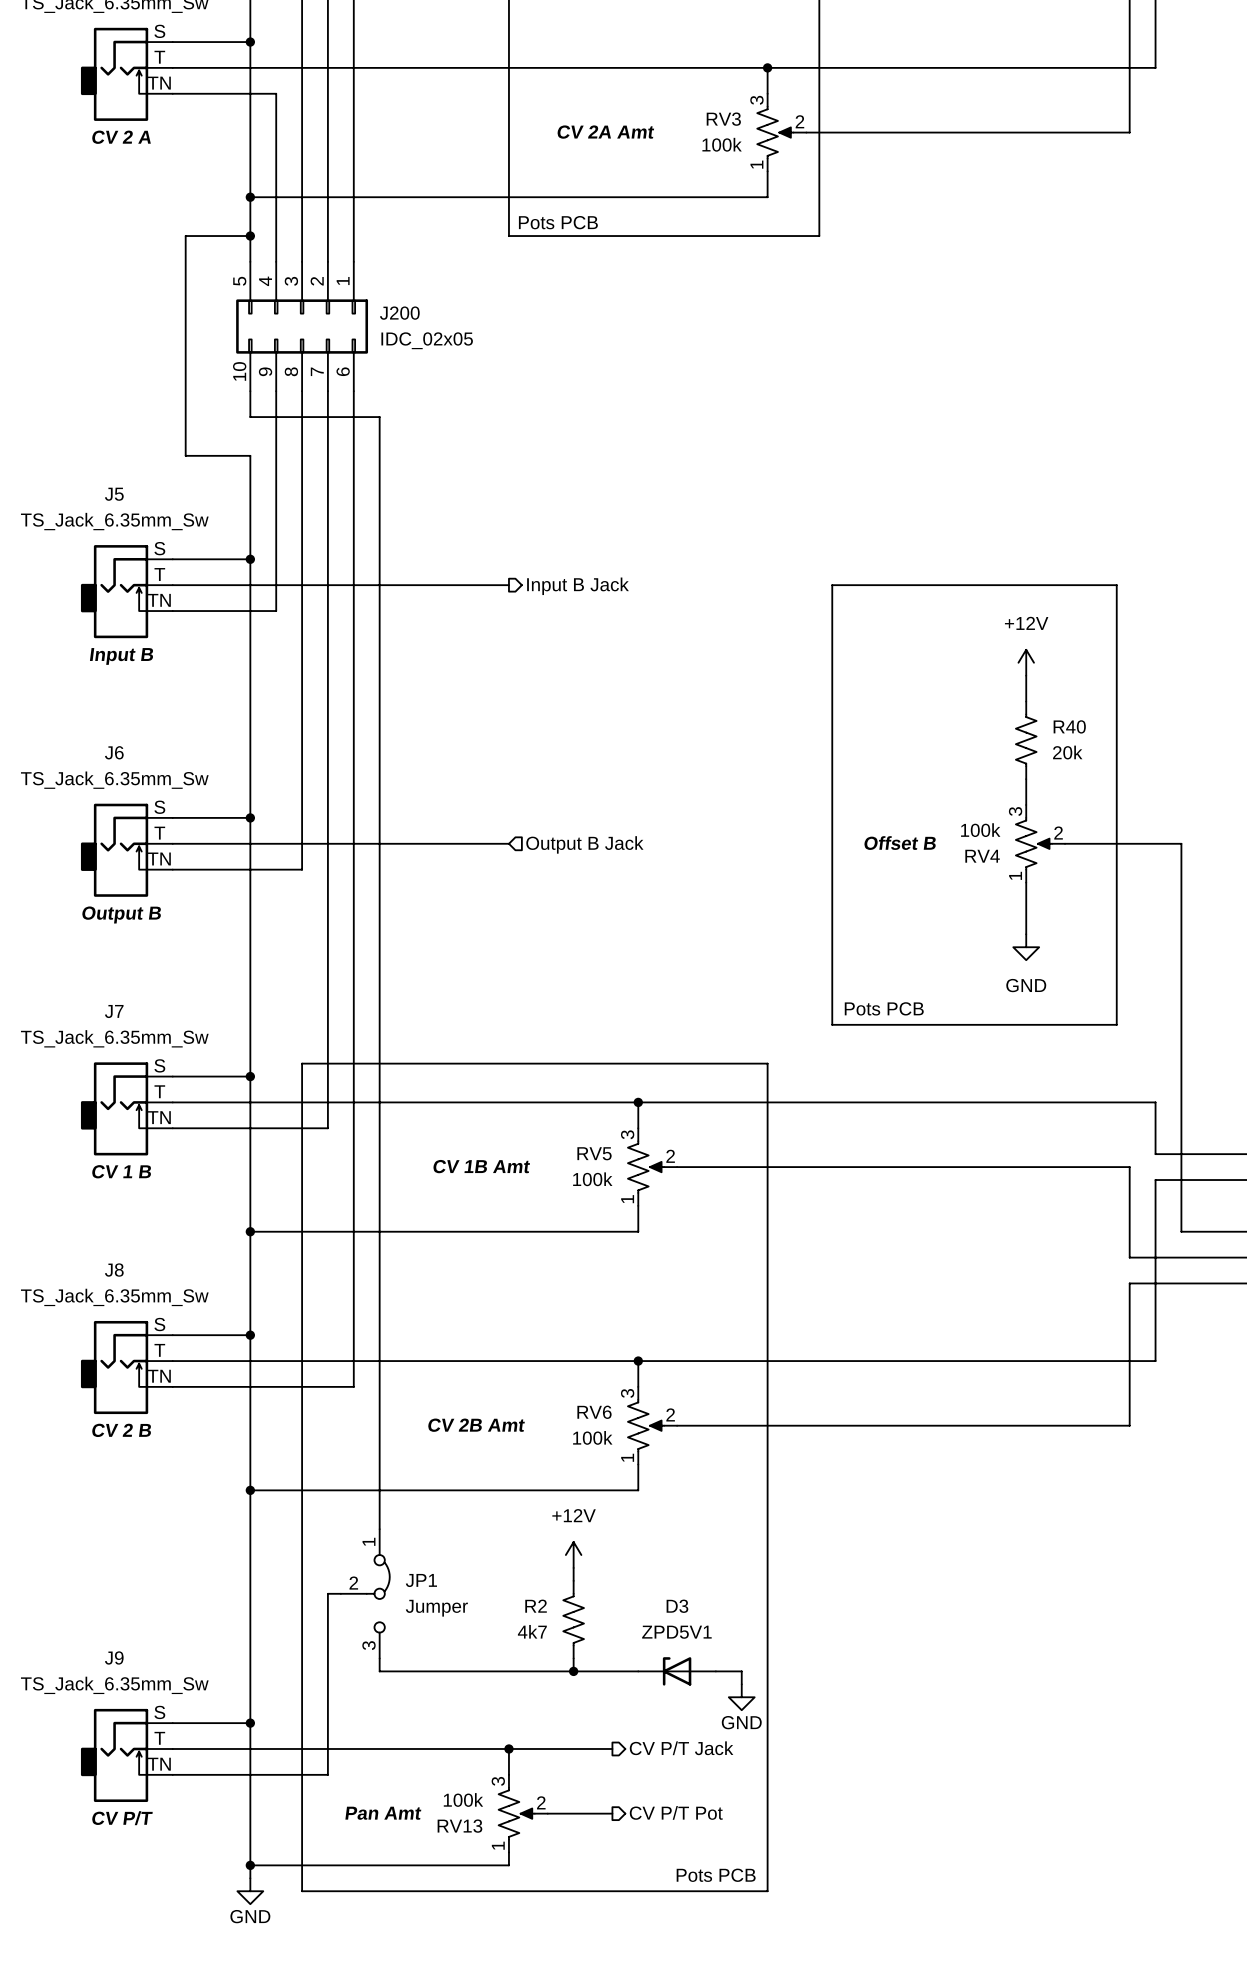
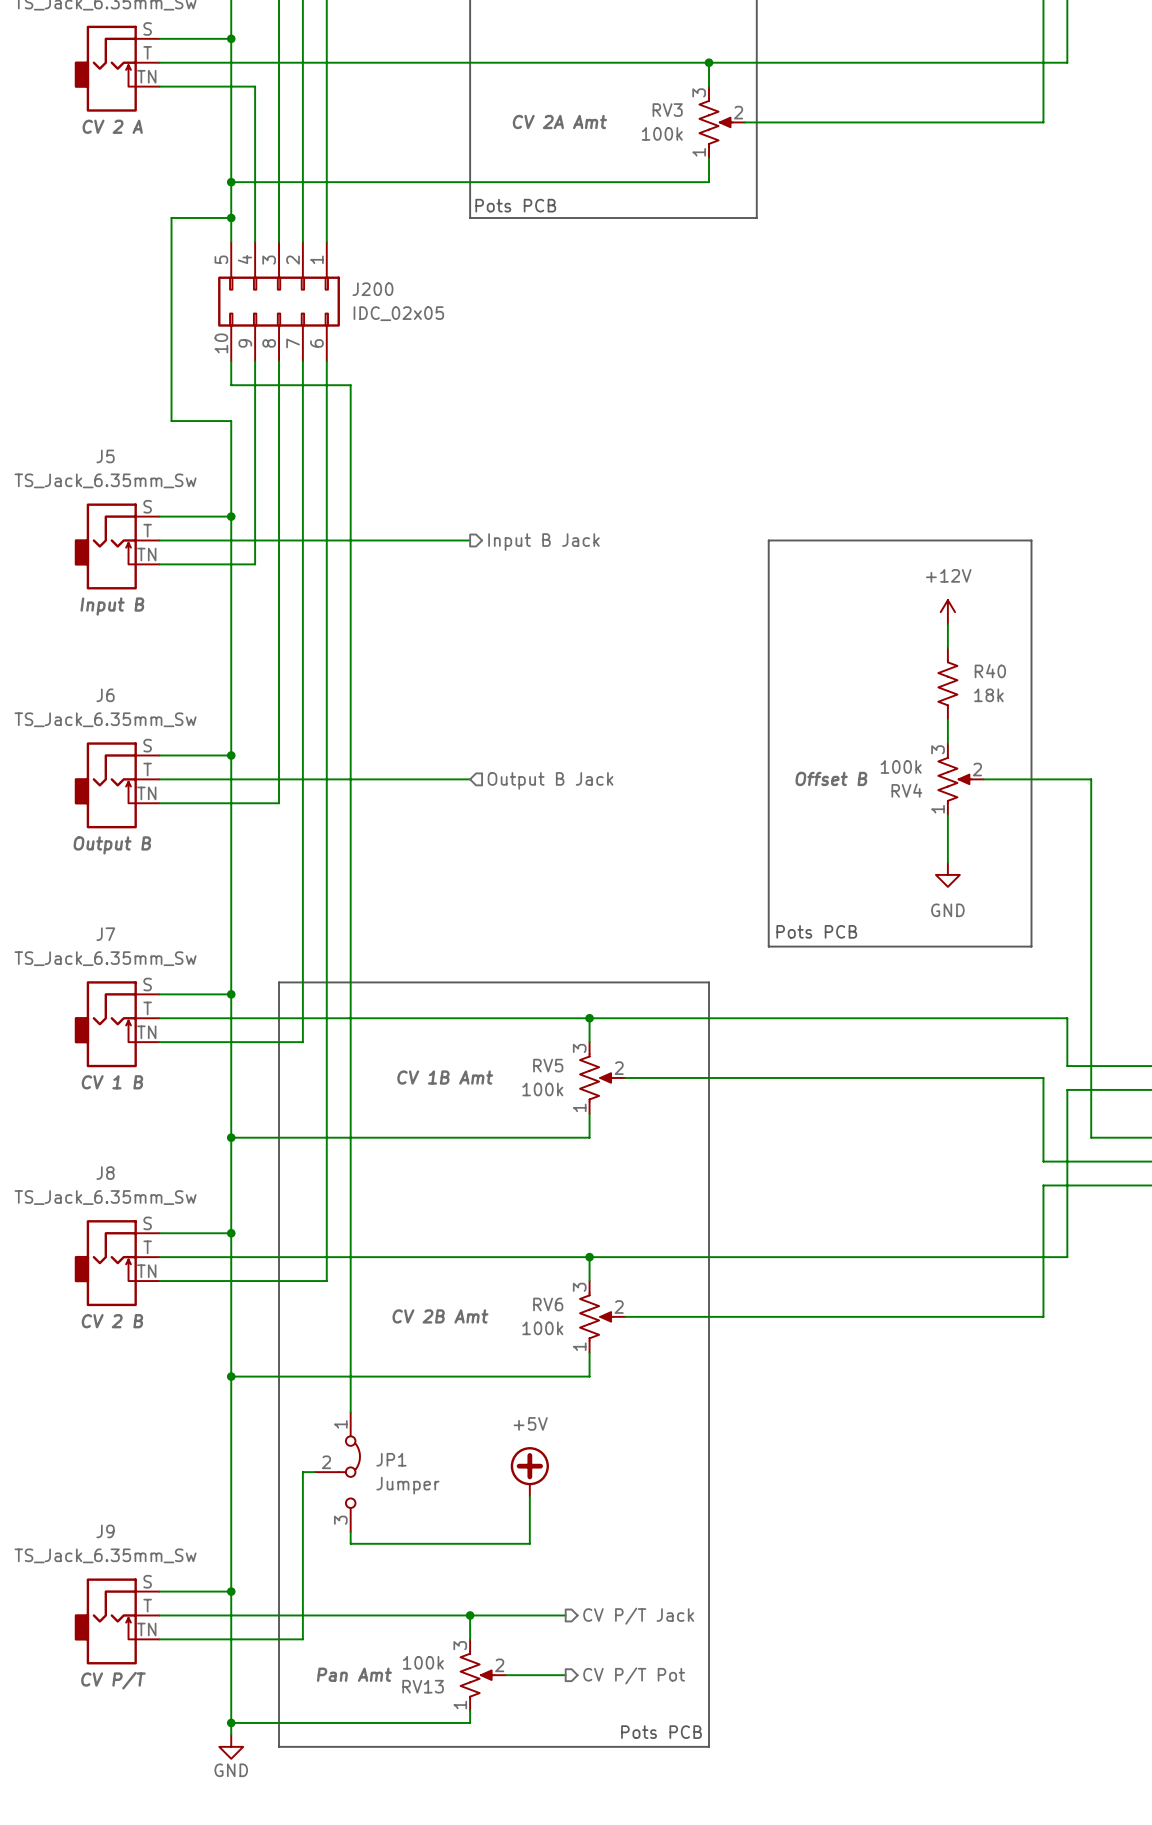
R40 value: 20k (1067, 752) -> 18k (988, 695)
power symbol: +12V (573, 1555) -> none
power symbol: none -> +5V (529, 1471)
R2: 4k7 (573, 1619) -> none
wire: (573, 1671) (638, 1671) -> none
junction: (573, 1671) -> none
D3: ZPD5V1 (677, 1671) -> none
wire: (715, 1671) (741, 1671) (741, 1684) -> none
power symbol: GND (741, 1697) -> none

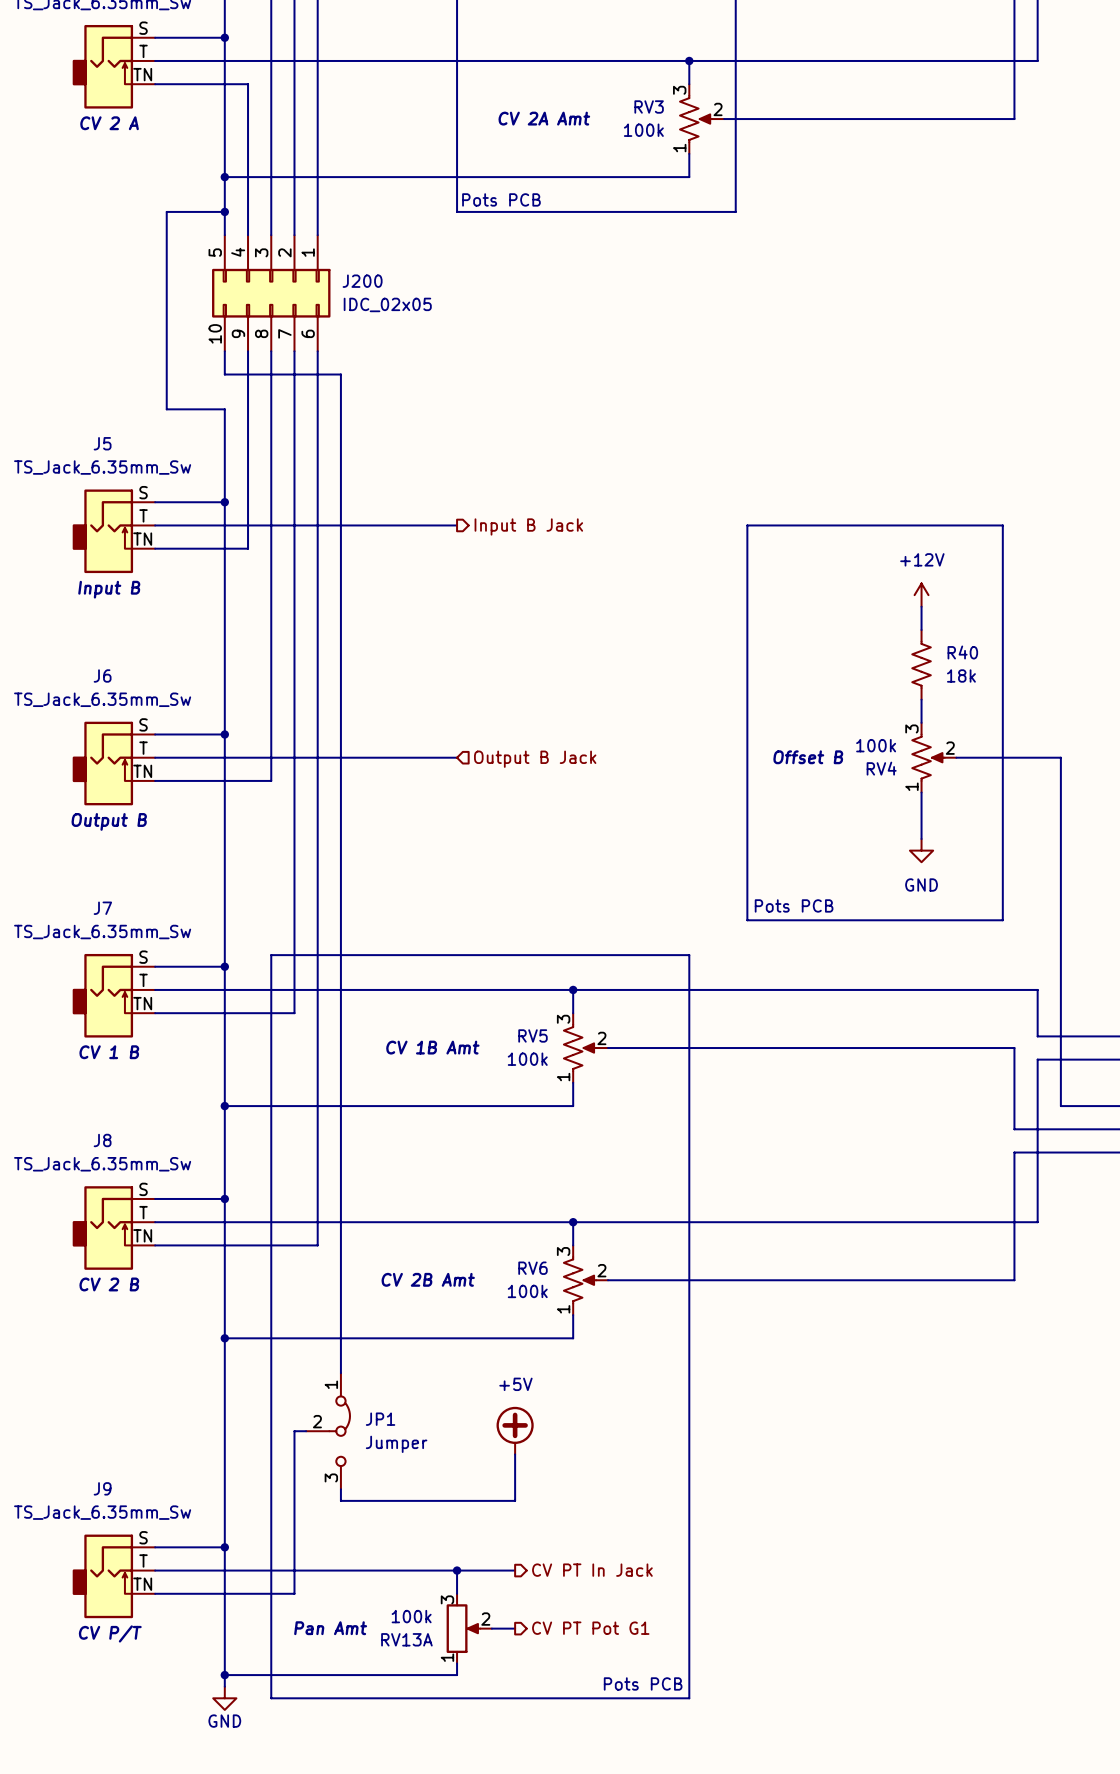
wire: (529, 1615) (565, 1615) -> none
hierarchical label: CV P/T Jack (638, 1616) -> CV PT In Jack (592, 1570)
RV13A: none -> 100k (469, 1628)
RV13: 100k (483, 1675) -> none
wire: (529, 1675) (565, 1675) -> none
hierarchical label: CV P/T Pot (634, 1675) -> CV PT Pot G1 (590, 1628)

